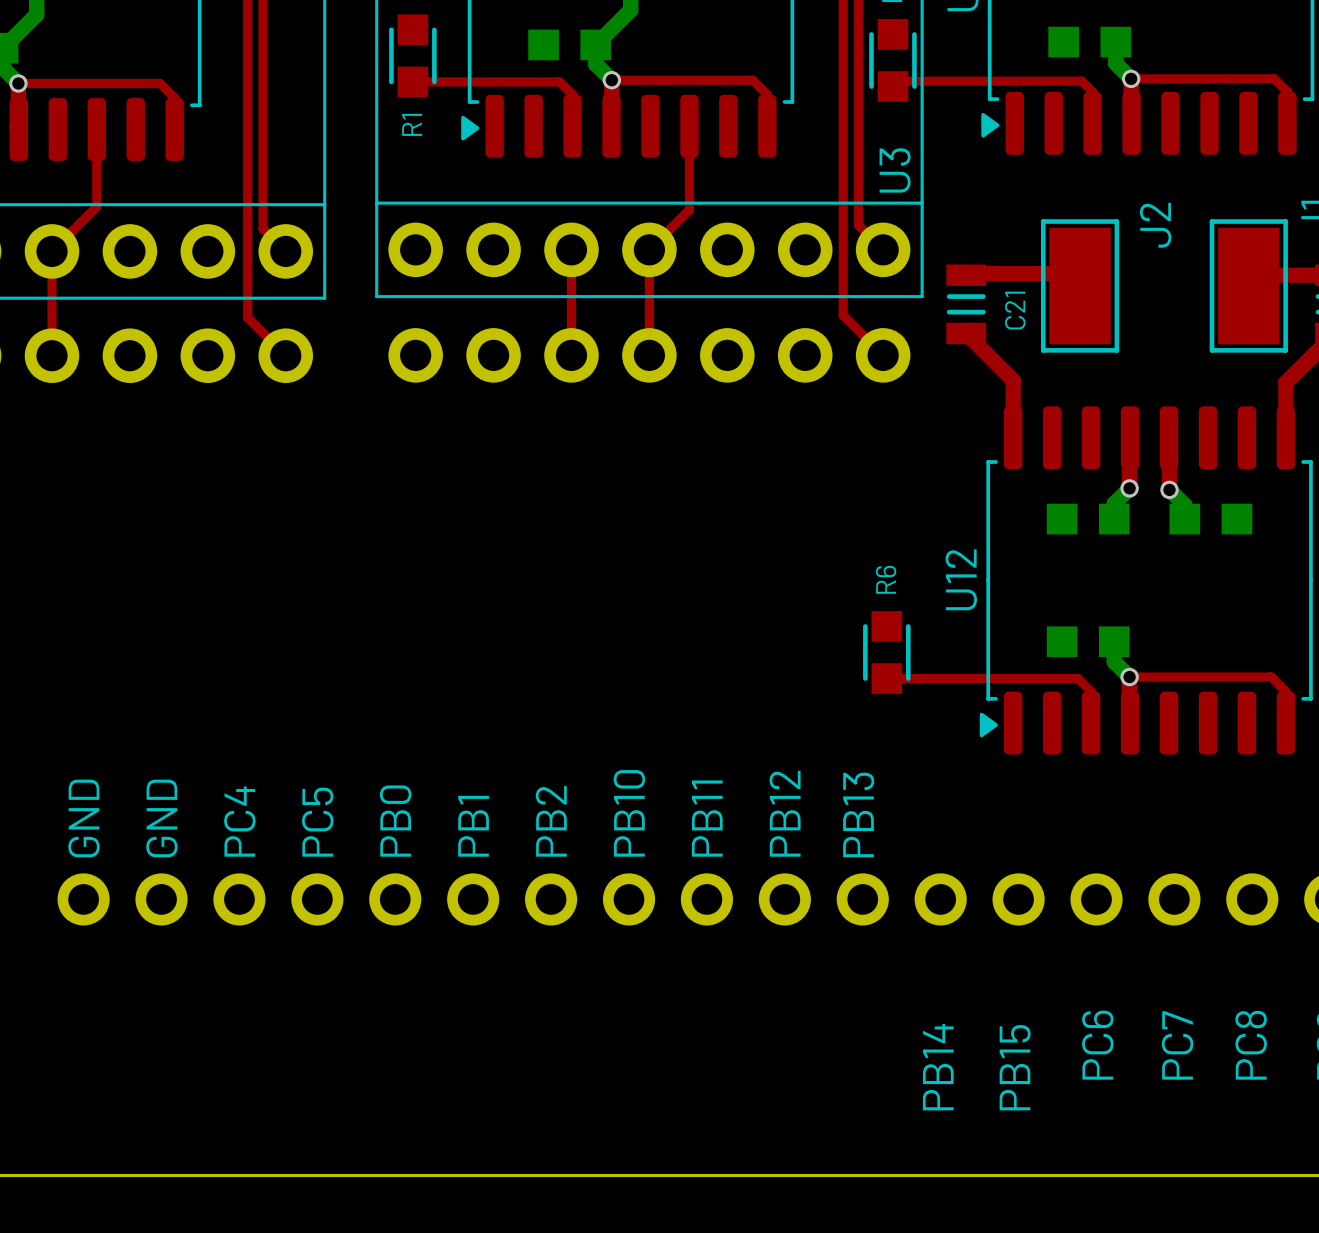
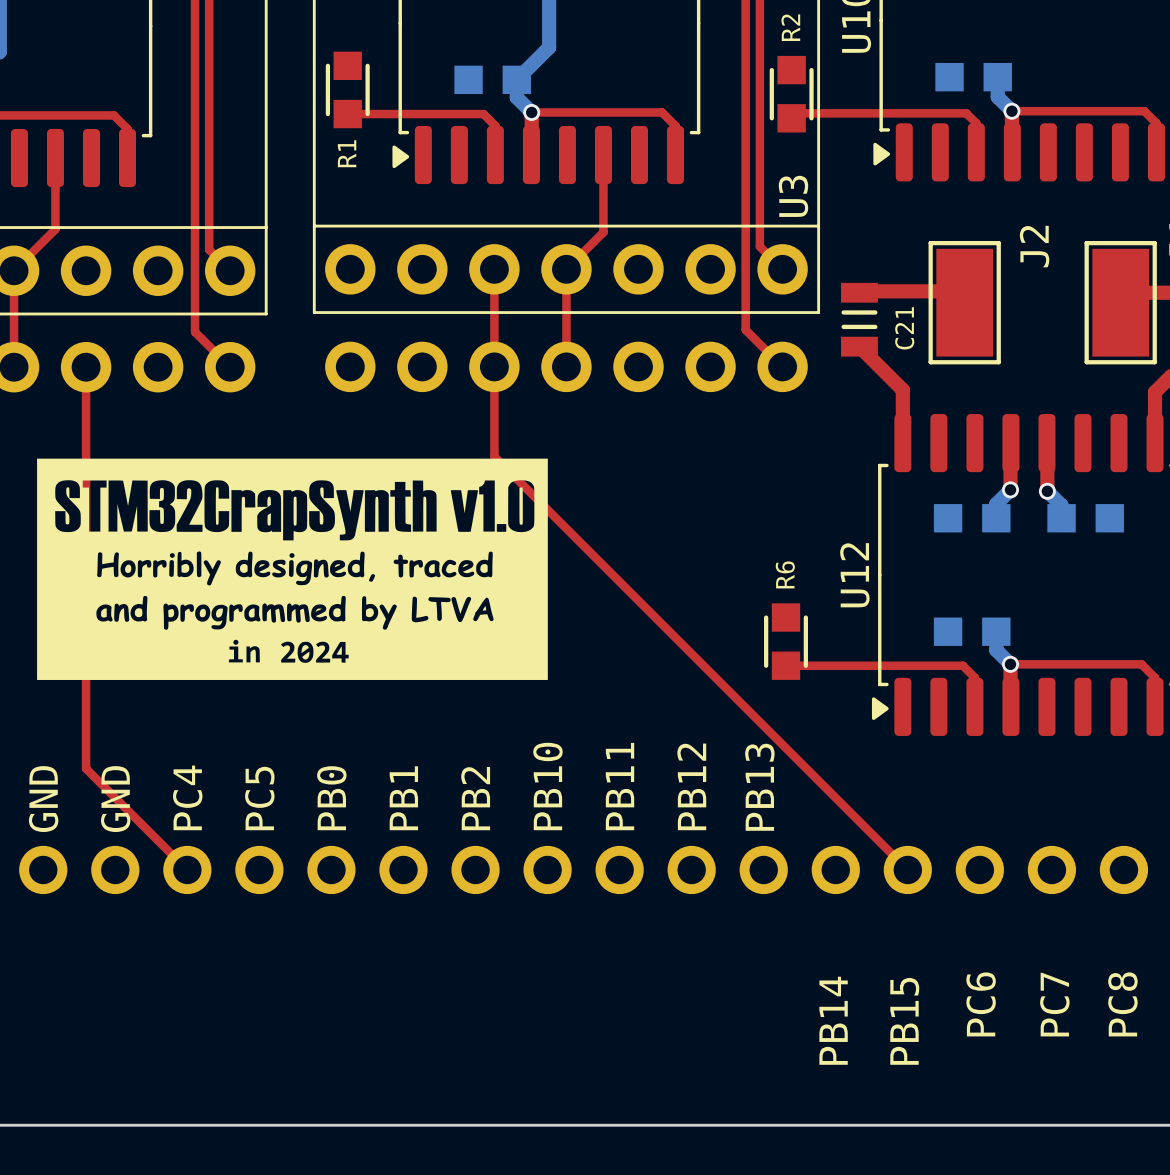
top track: none -> (86, 367) (86, 768) (187, 869)
top track: none -> (494, 366) (494, 456) (907, 869)
drawing: none -> [37, 458, 548, 680]

